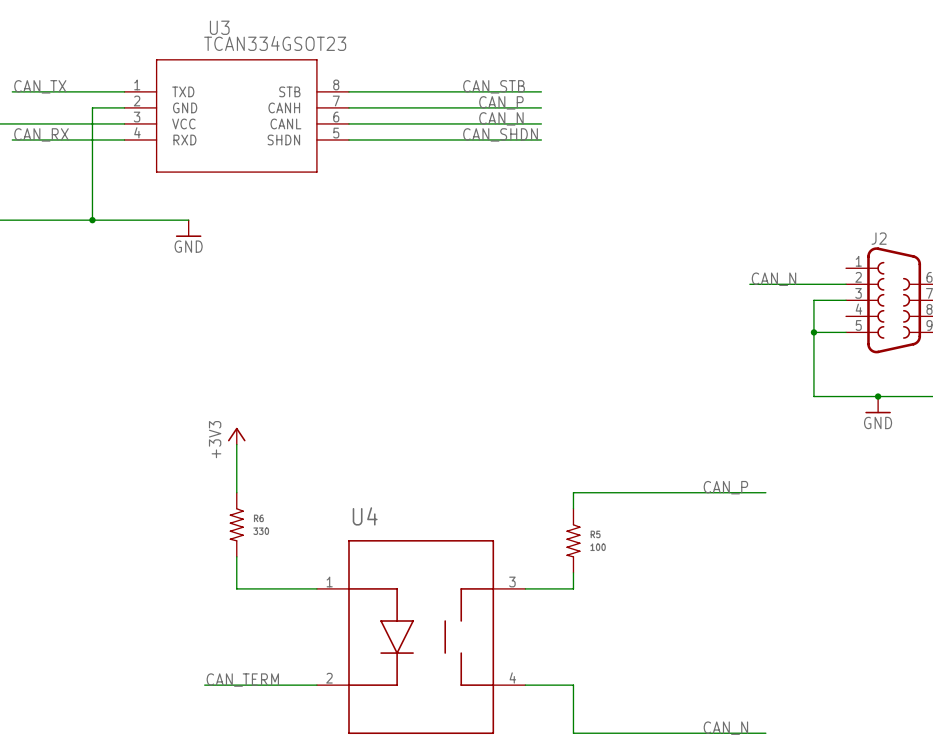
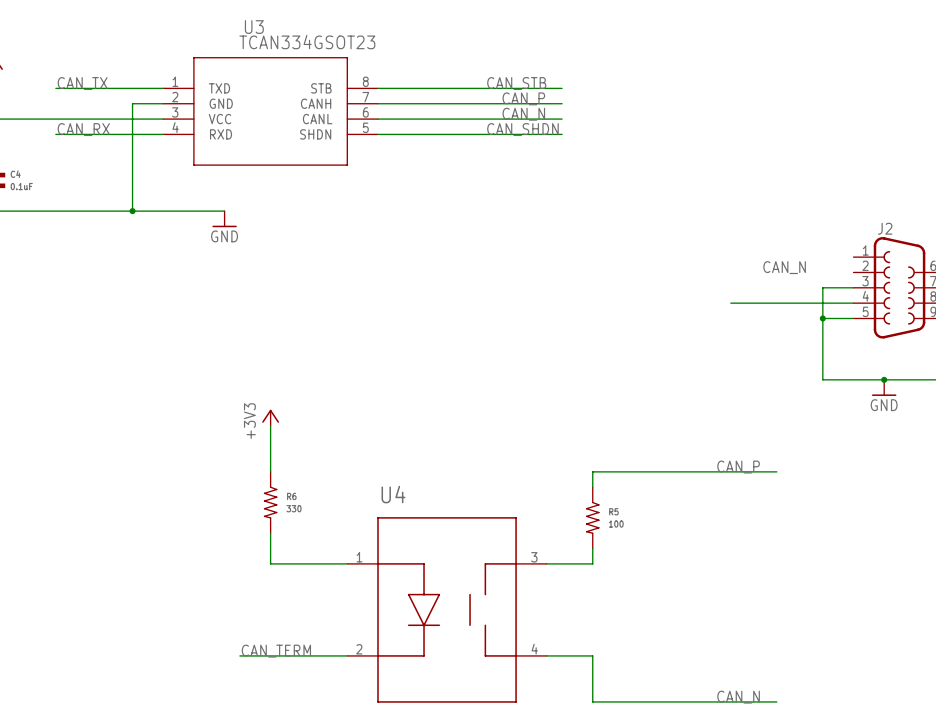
wire: (749, 284) (846, 284) -> none
wire: none -> (730, 303) (853, 303)

